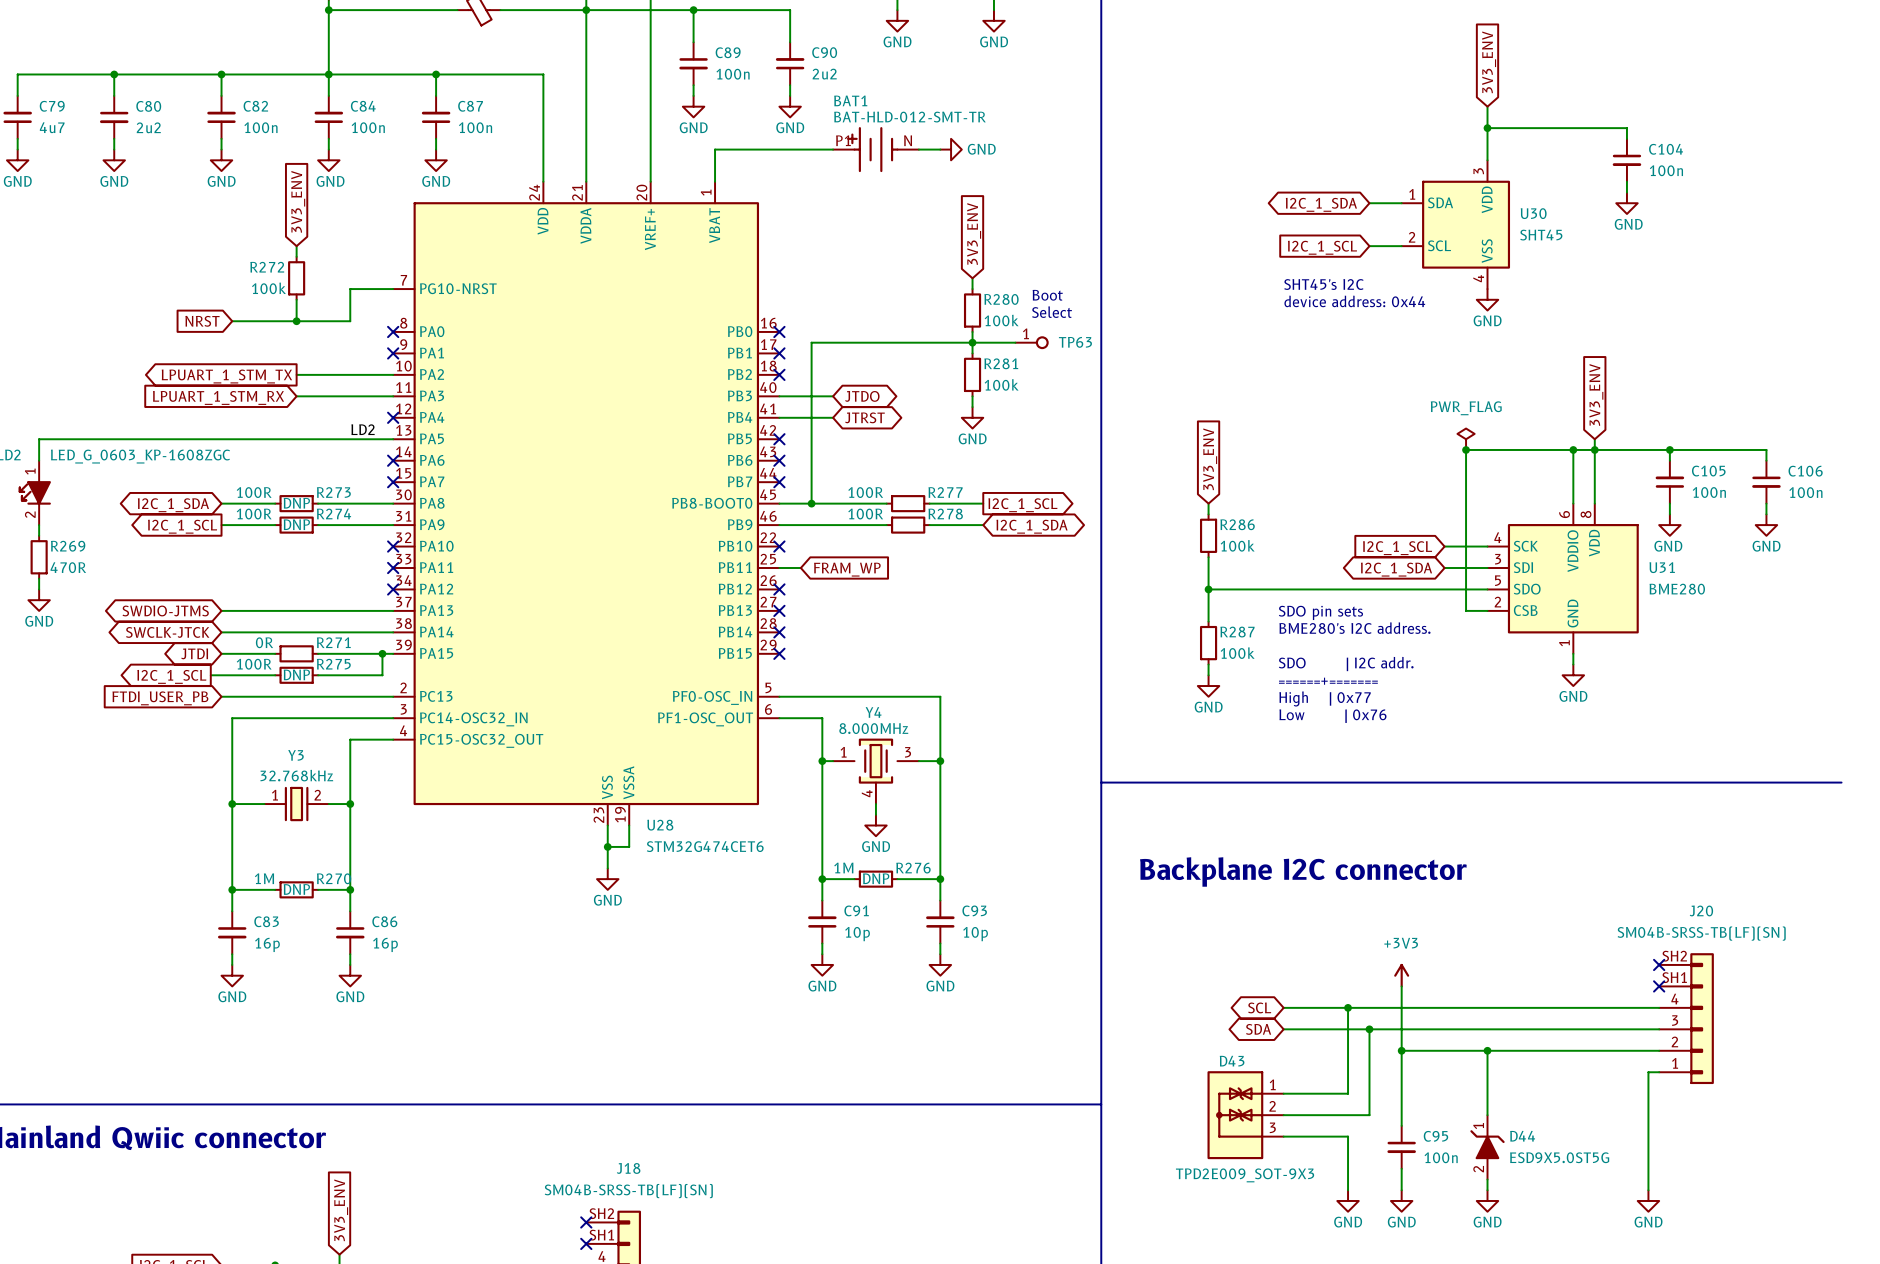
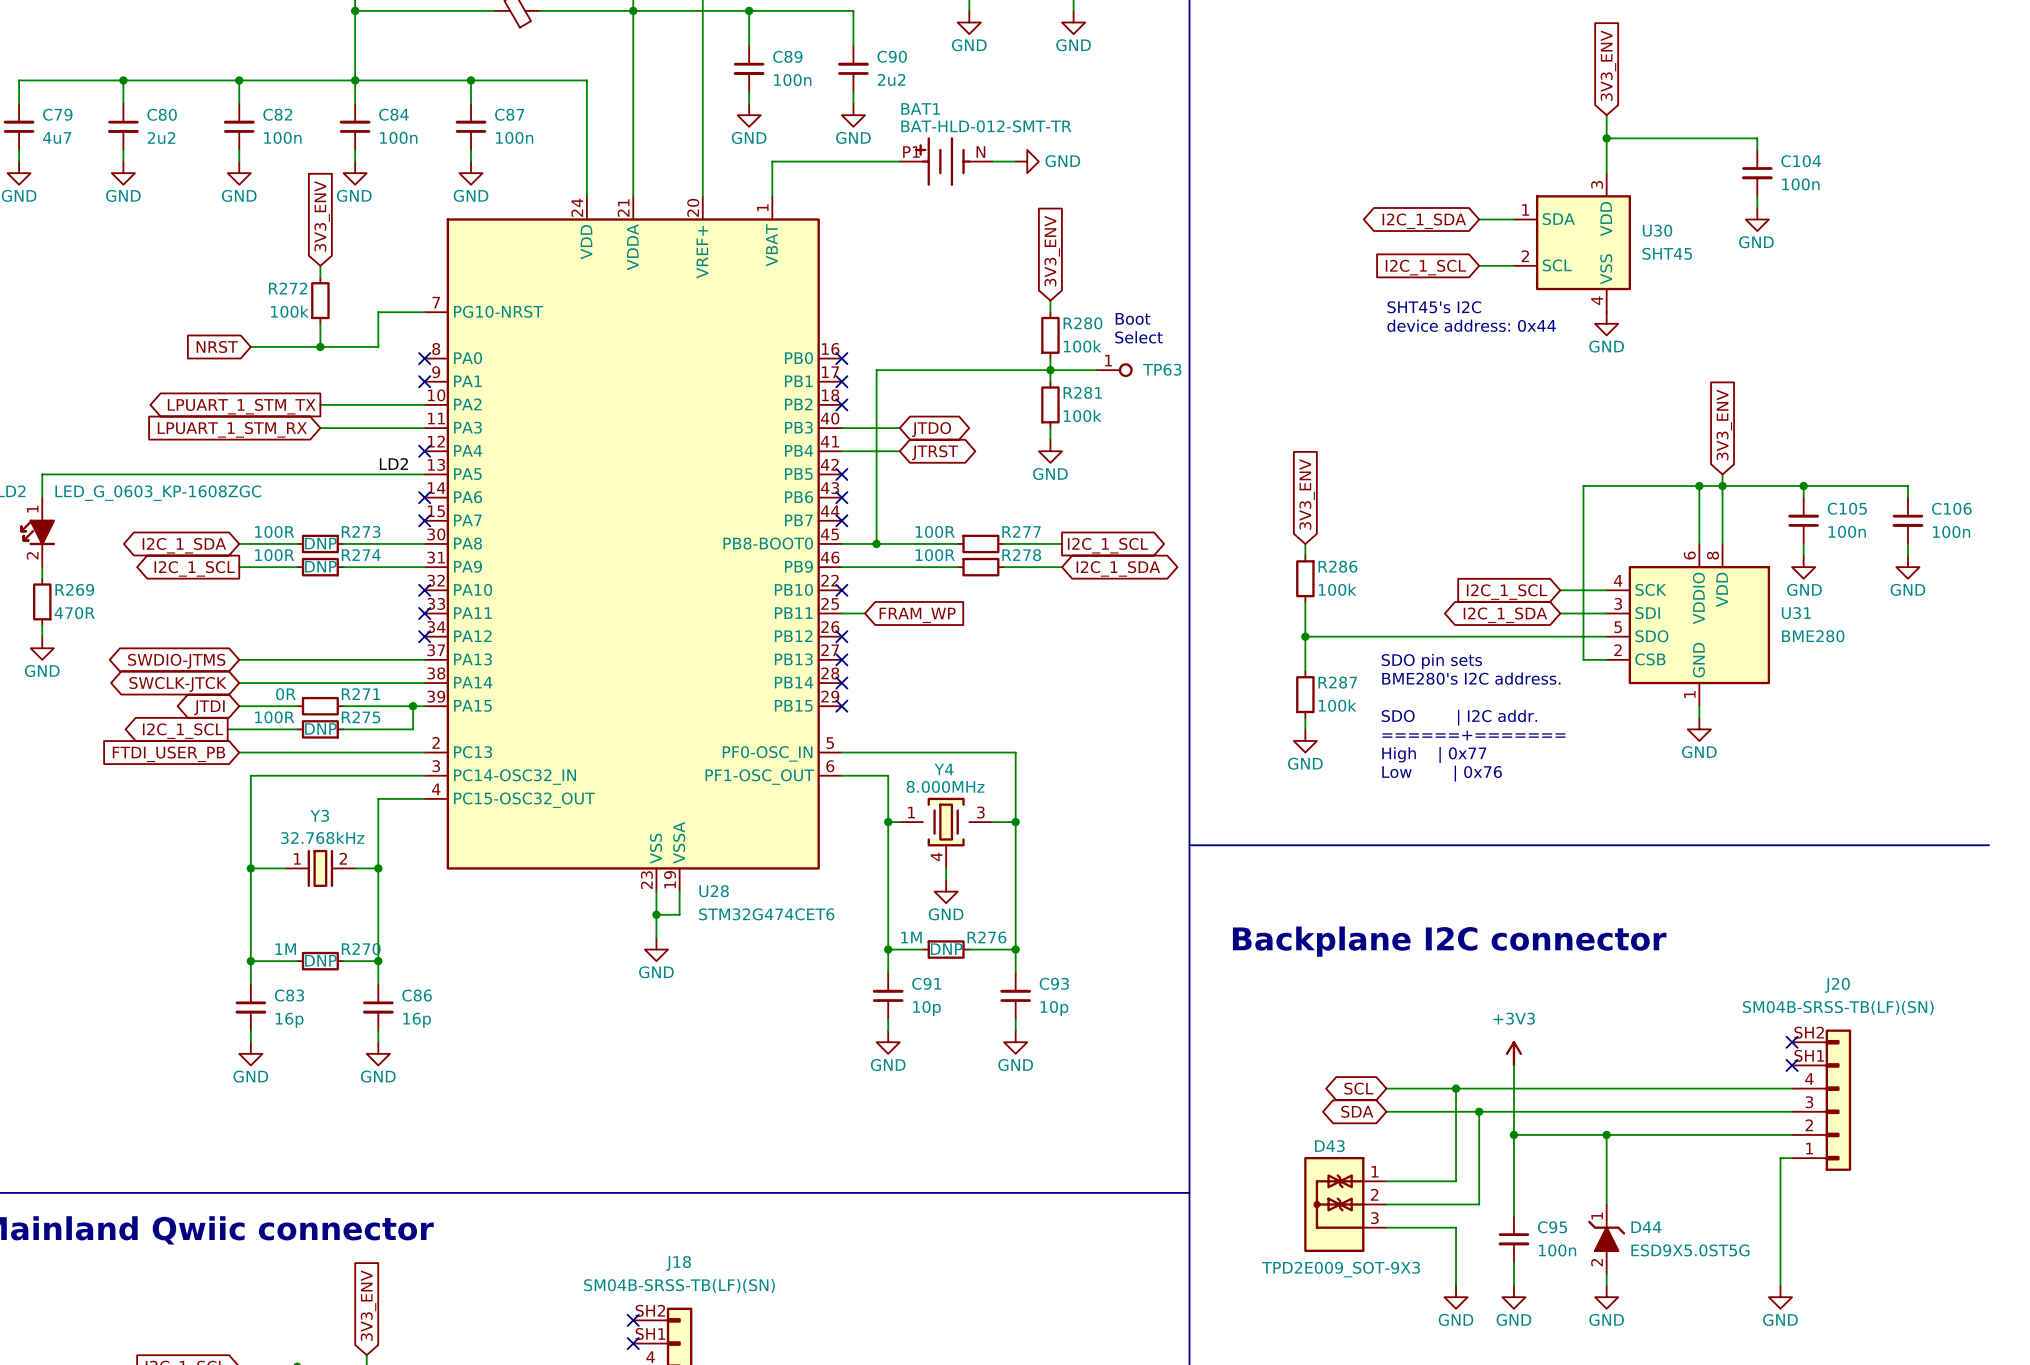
power symbol: PWR_FLAG (1466, 439) -> none
junction: (1466, 449) -> none

